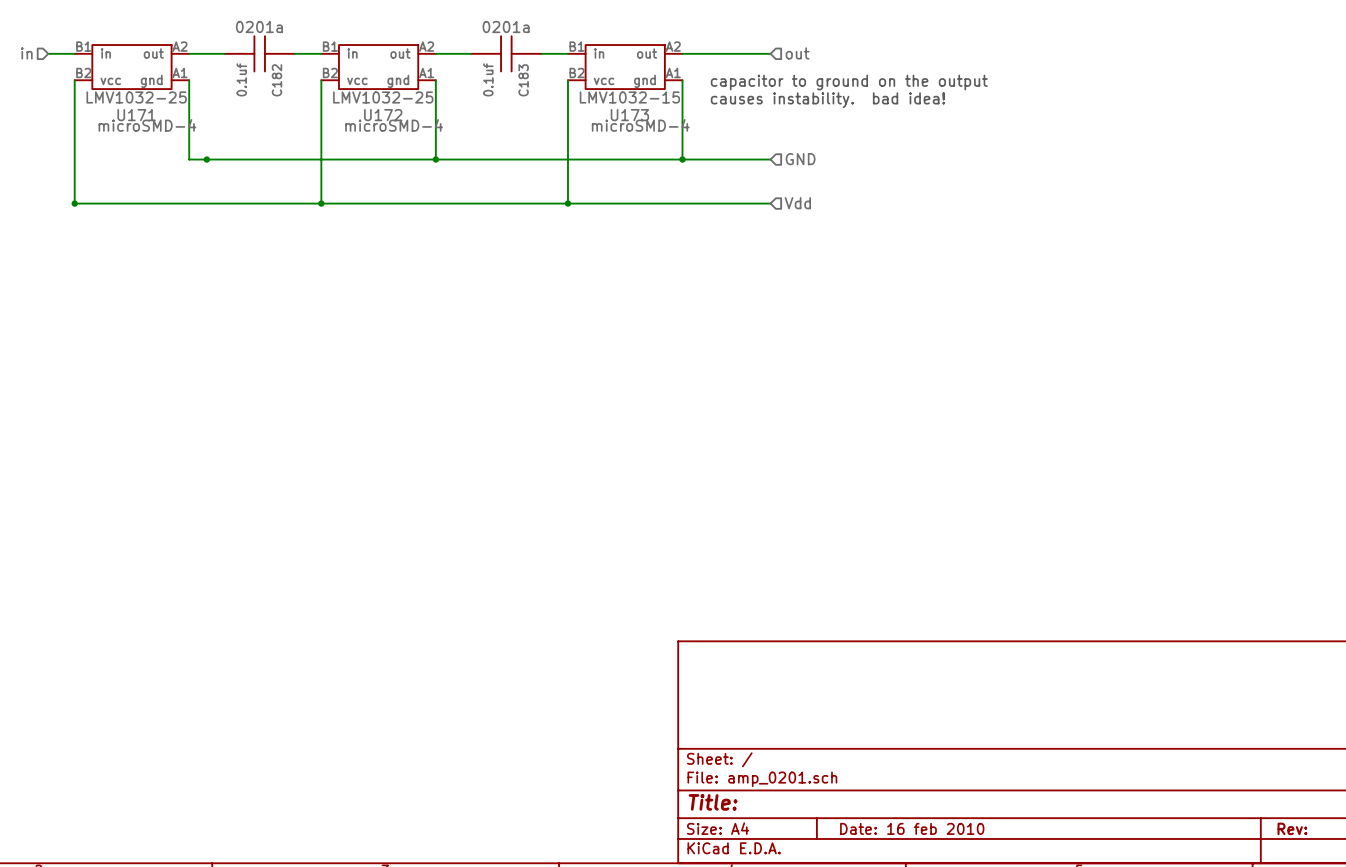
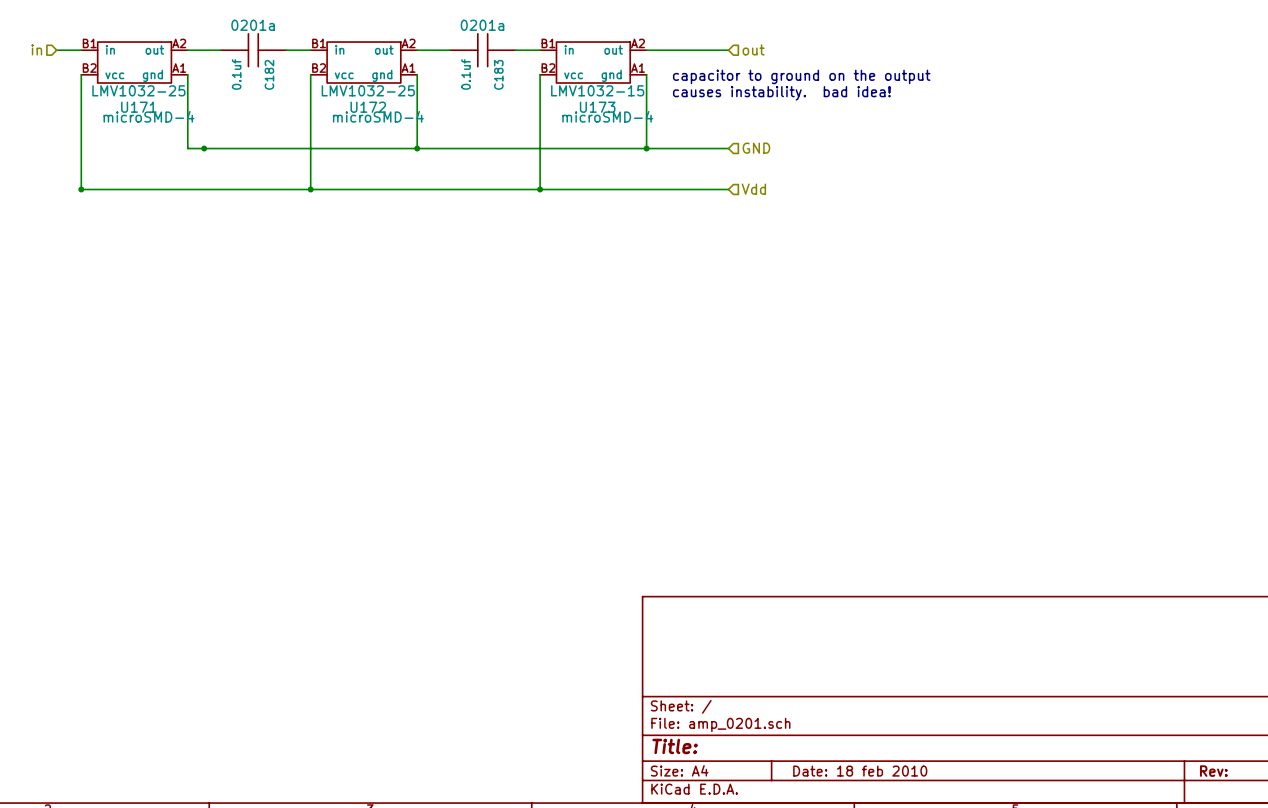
title block: Date: 16 feb 2010 (912, 828) -> Date: 18 feb 2010 (860, 771)

